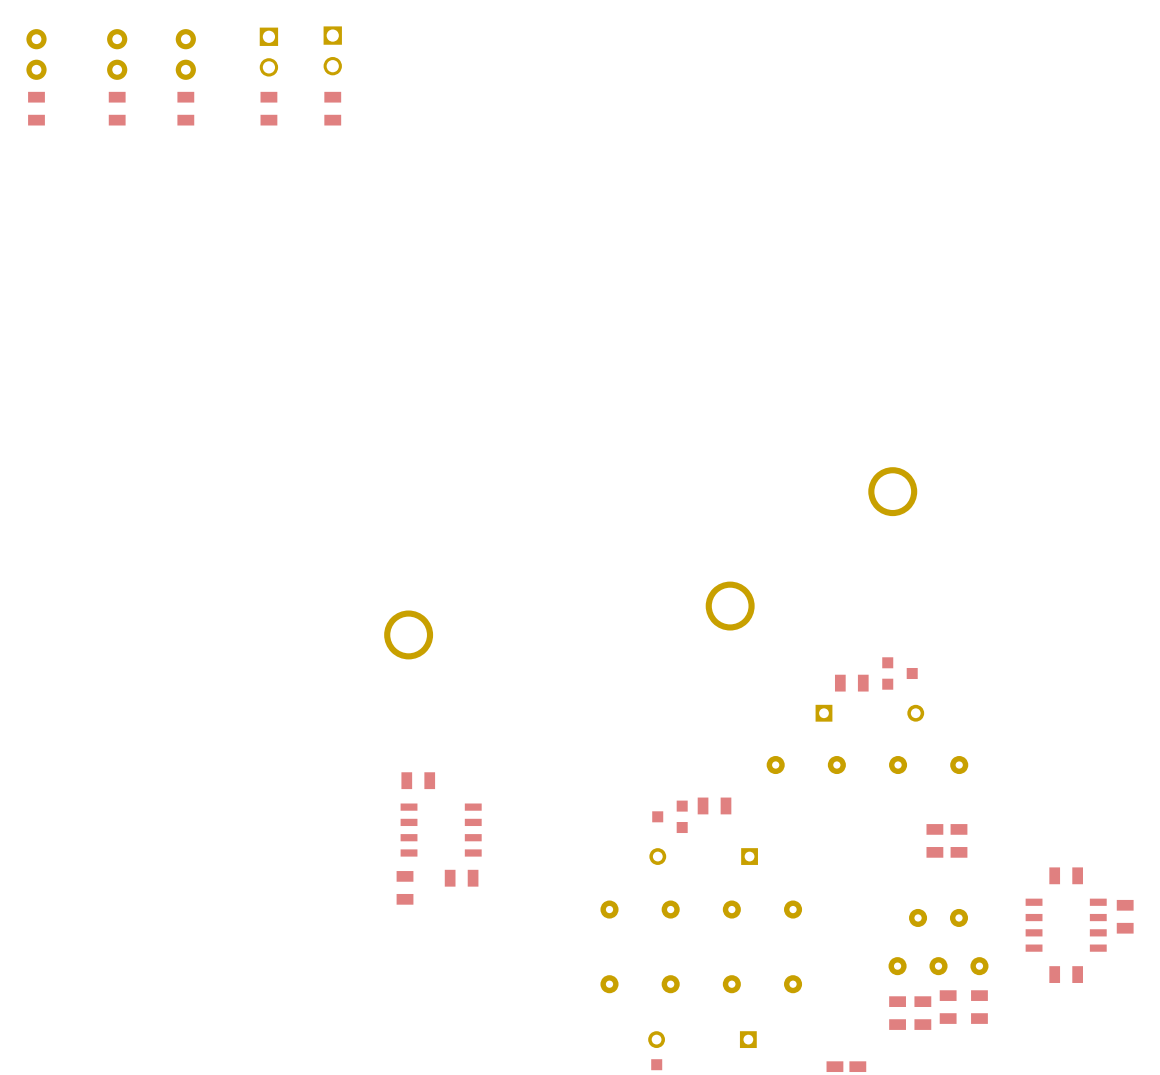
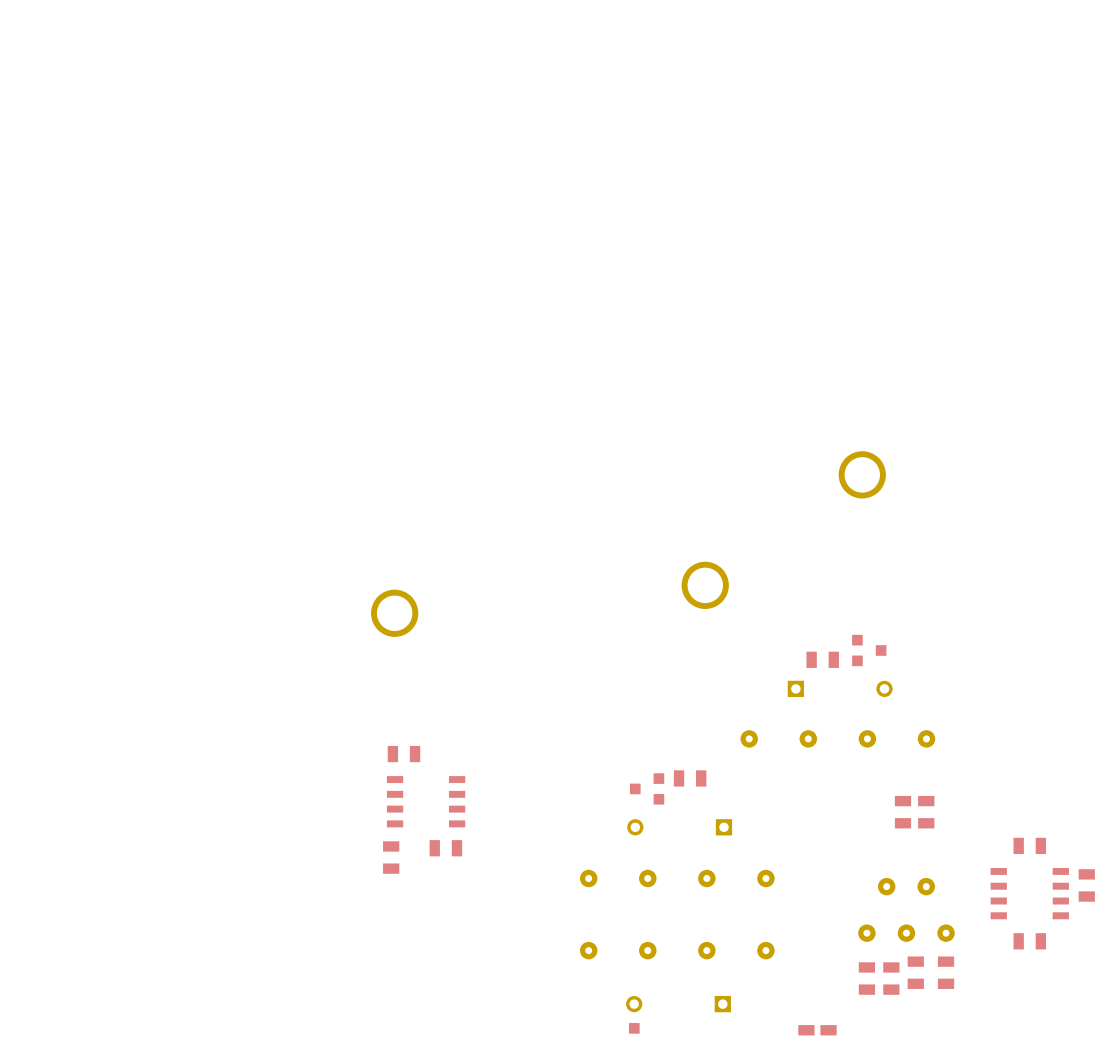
part: (332, 50) -> none
part: (268, 52) -> none
part: (36, 54) -> none
part: (117, 54) -> none
part: (185, 54) -> none
part: (36, 108) -> none
part: (117, 108) -> none
part: (185, 108) -> none
part: (268, 108) -> none
part: (332, 108) -> none

